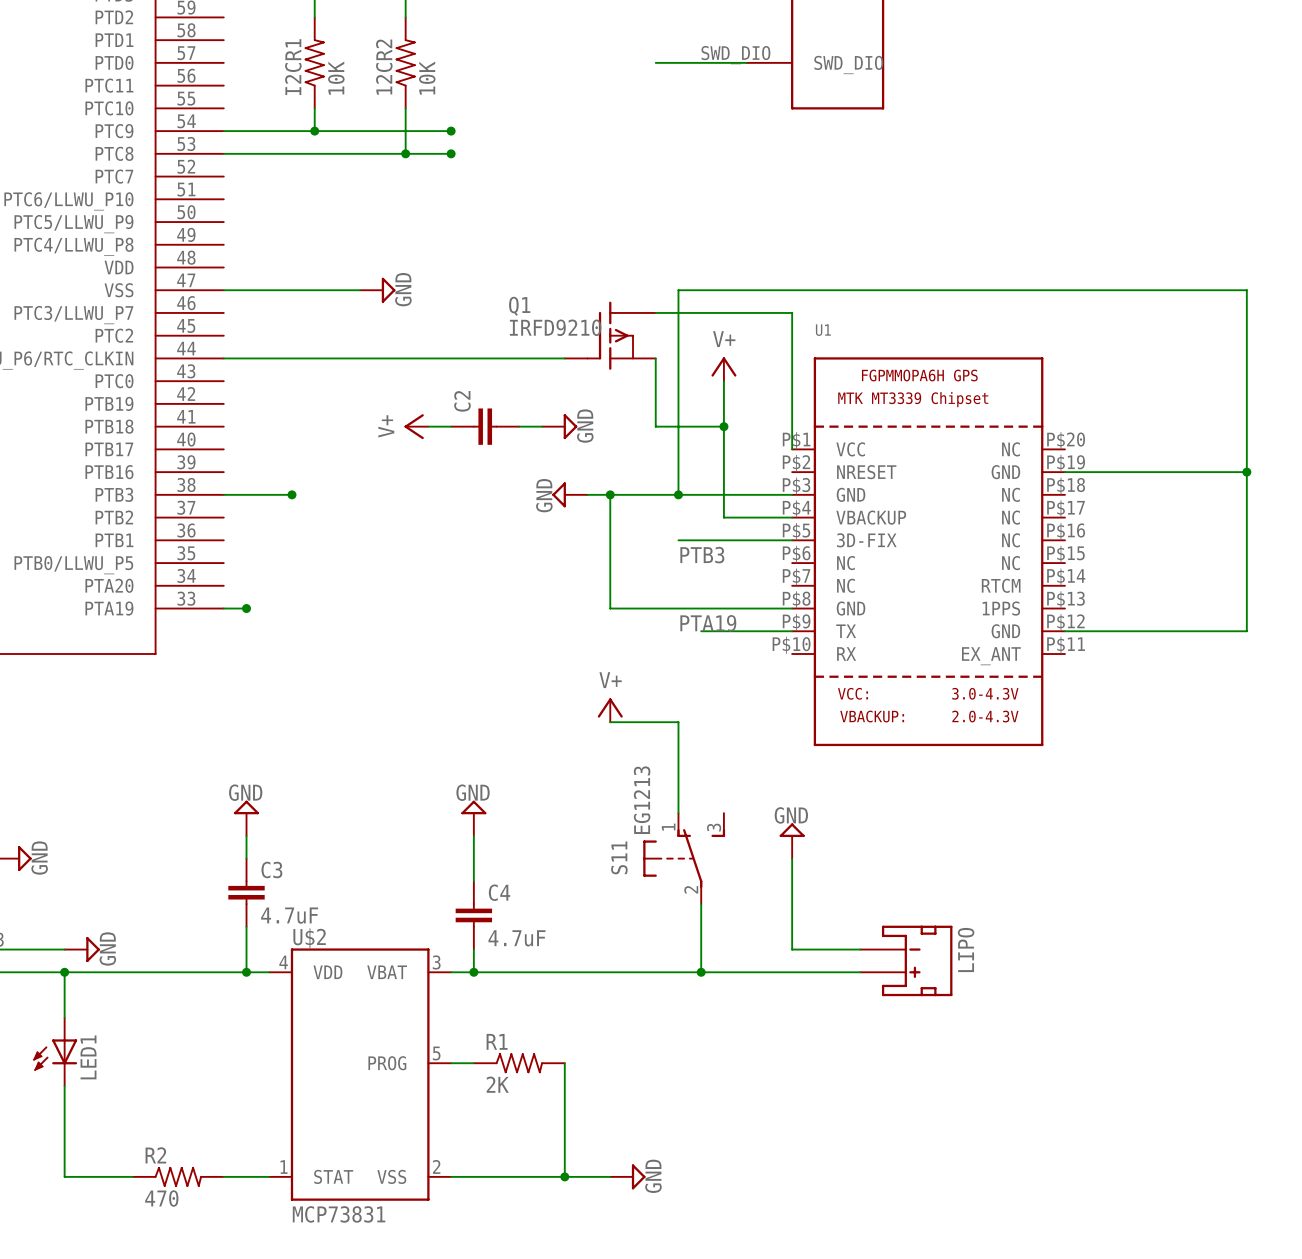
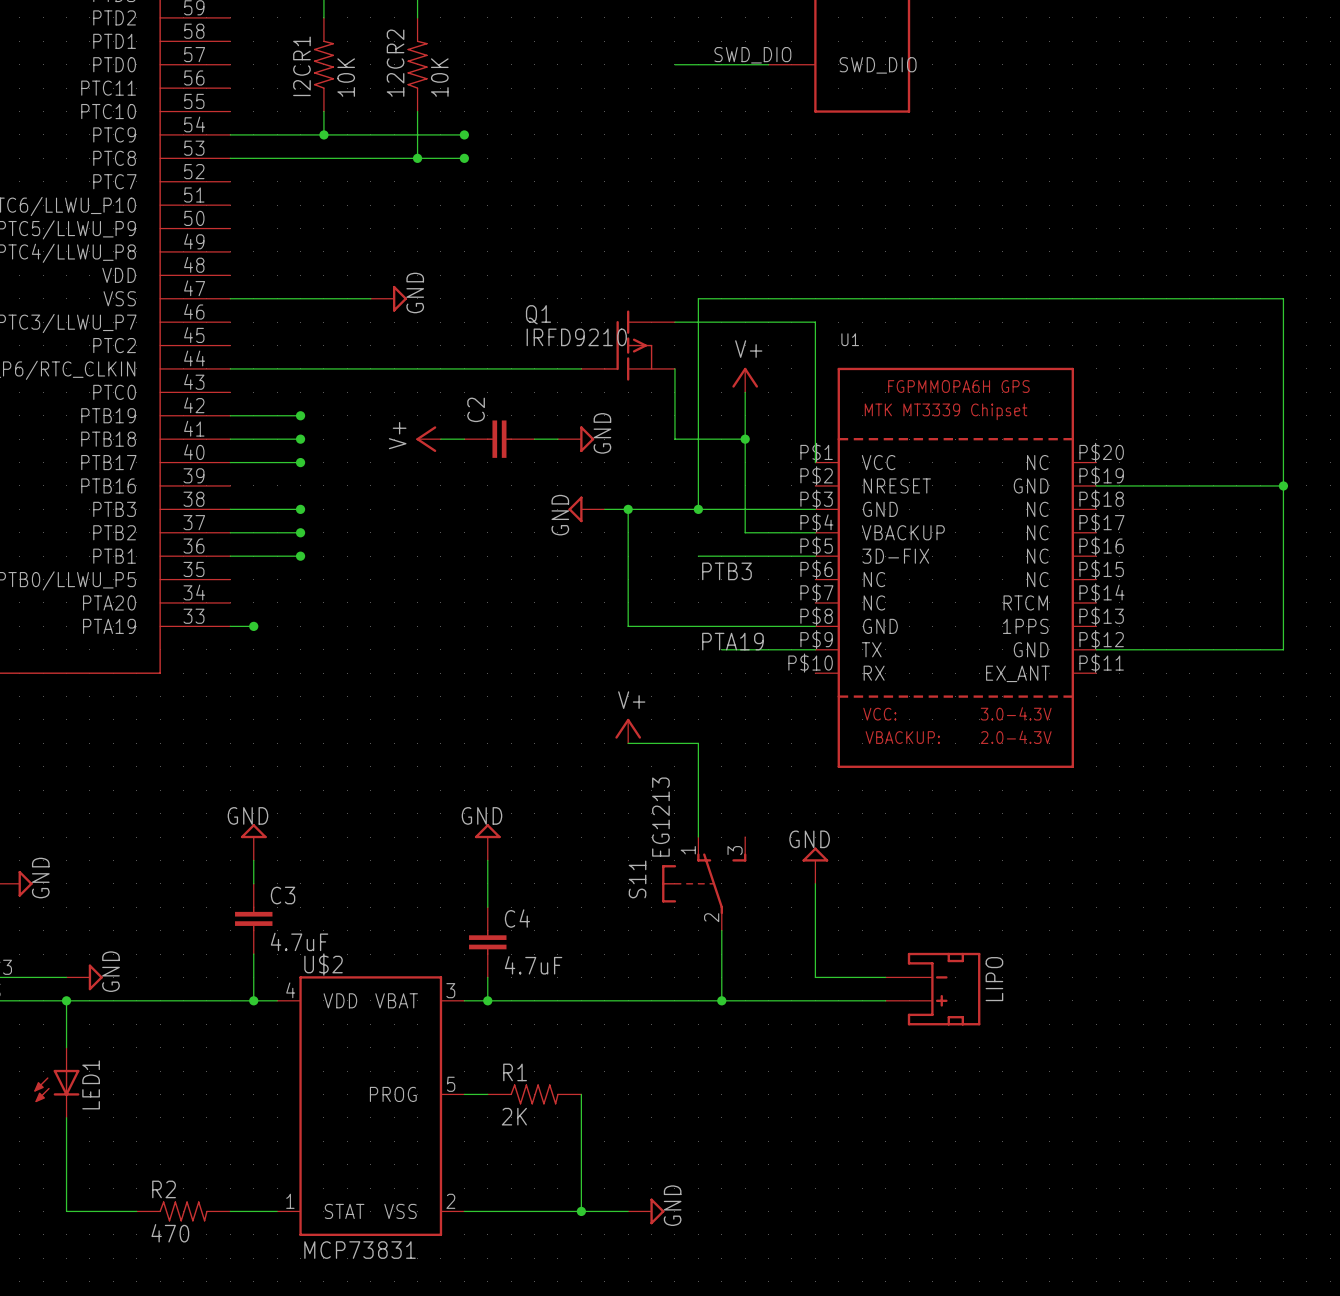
wire: none -> (230, 415) (300, 415)
junction: none -> (300, 415)
wire: none -> (230, 439) (300, 439)
junction: none -> (300, 439)
wire: none -> (230, 462) (300, 462)
junction: none -> (300, 462)
wire: none -> (230, 532) (300, 532)
junction: none -> (300, 532)
wire: none -> (230, 556) (300, 556)
junction: none -> (300, 556)

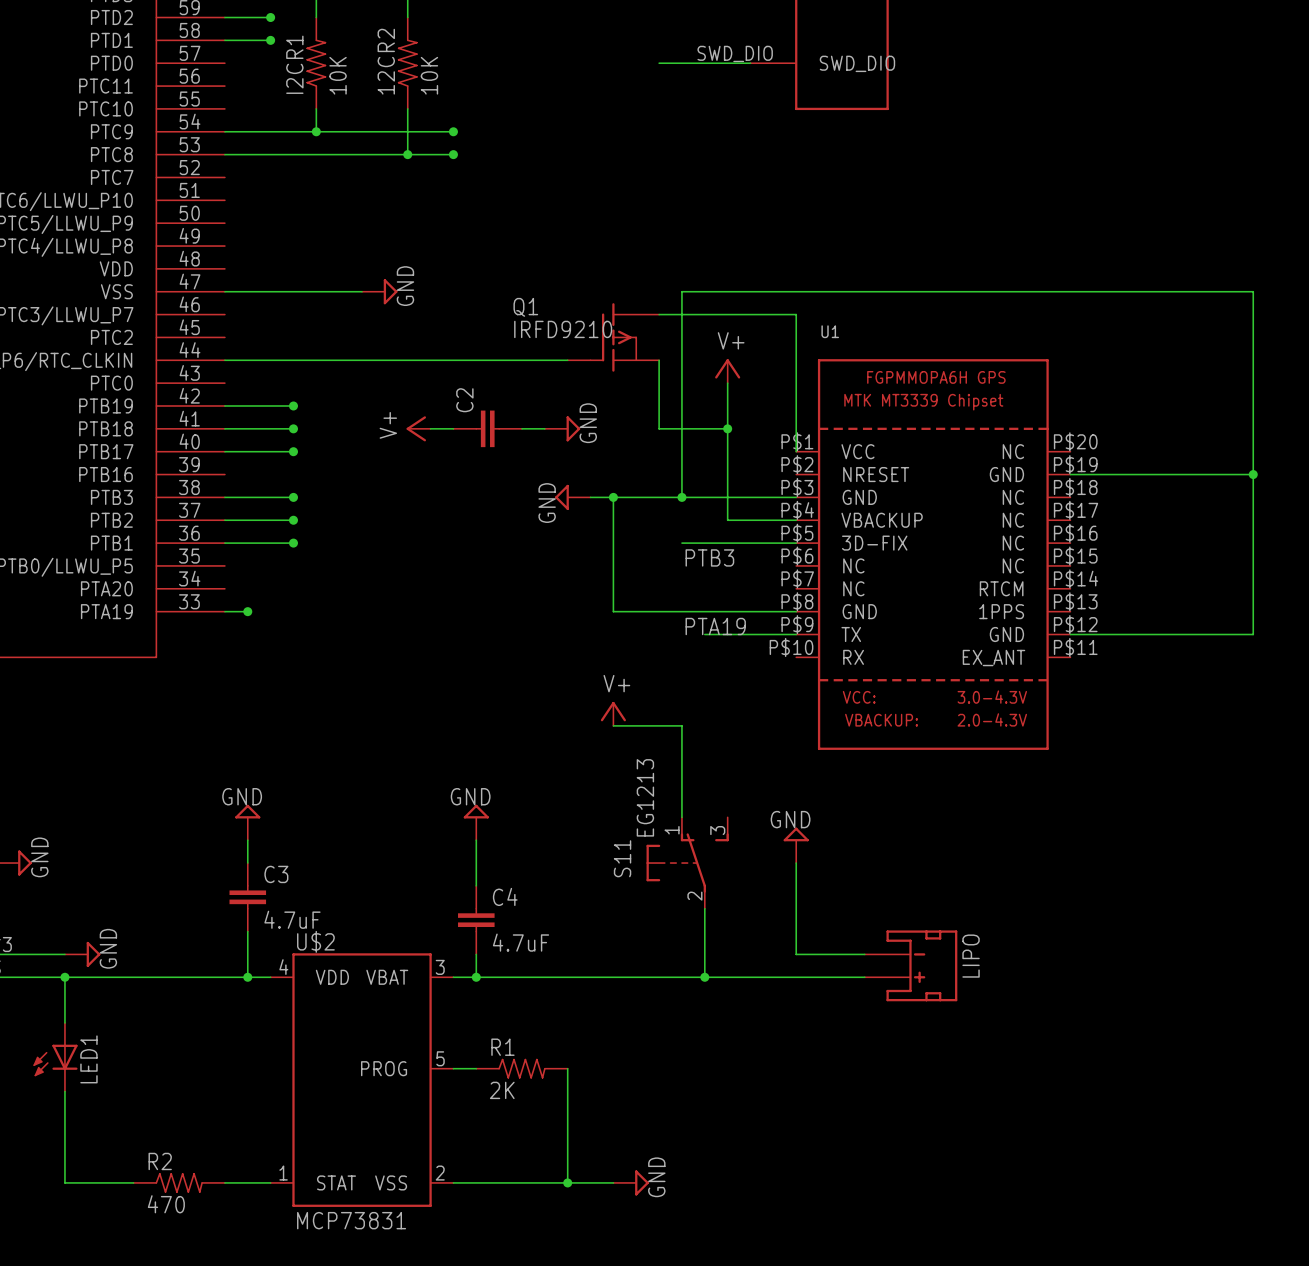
wire: none -> (224, 17) (270, 17)
junction: none -> (270, 17)
wire: none -> (224, 40) (270, 40)
junction: none -> (270, 40)

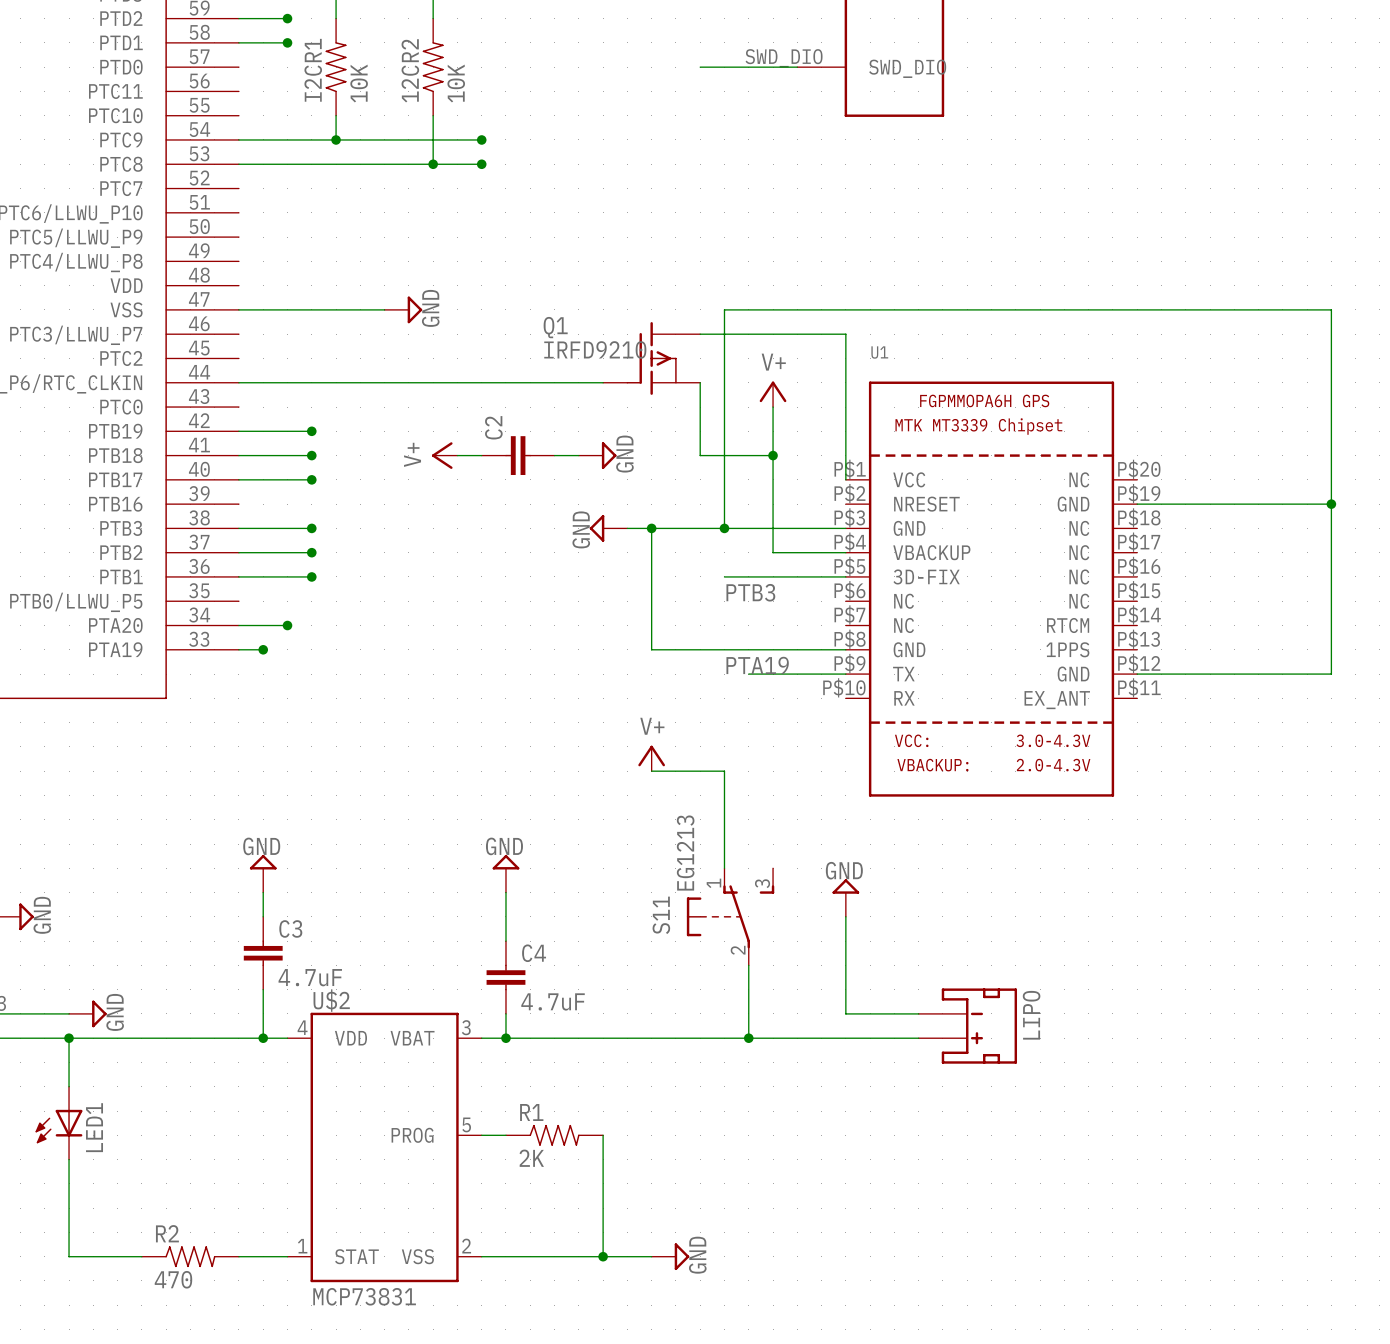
wire: none -> (238, 625) (287, 625)
junction: none -> (287, 625)

